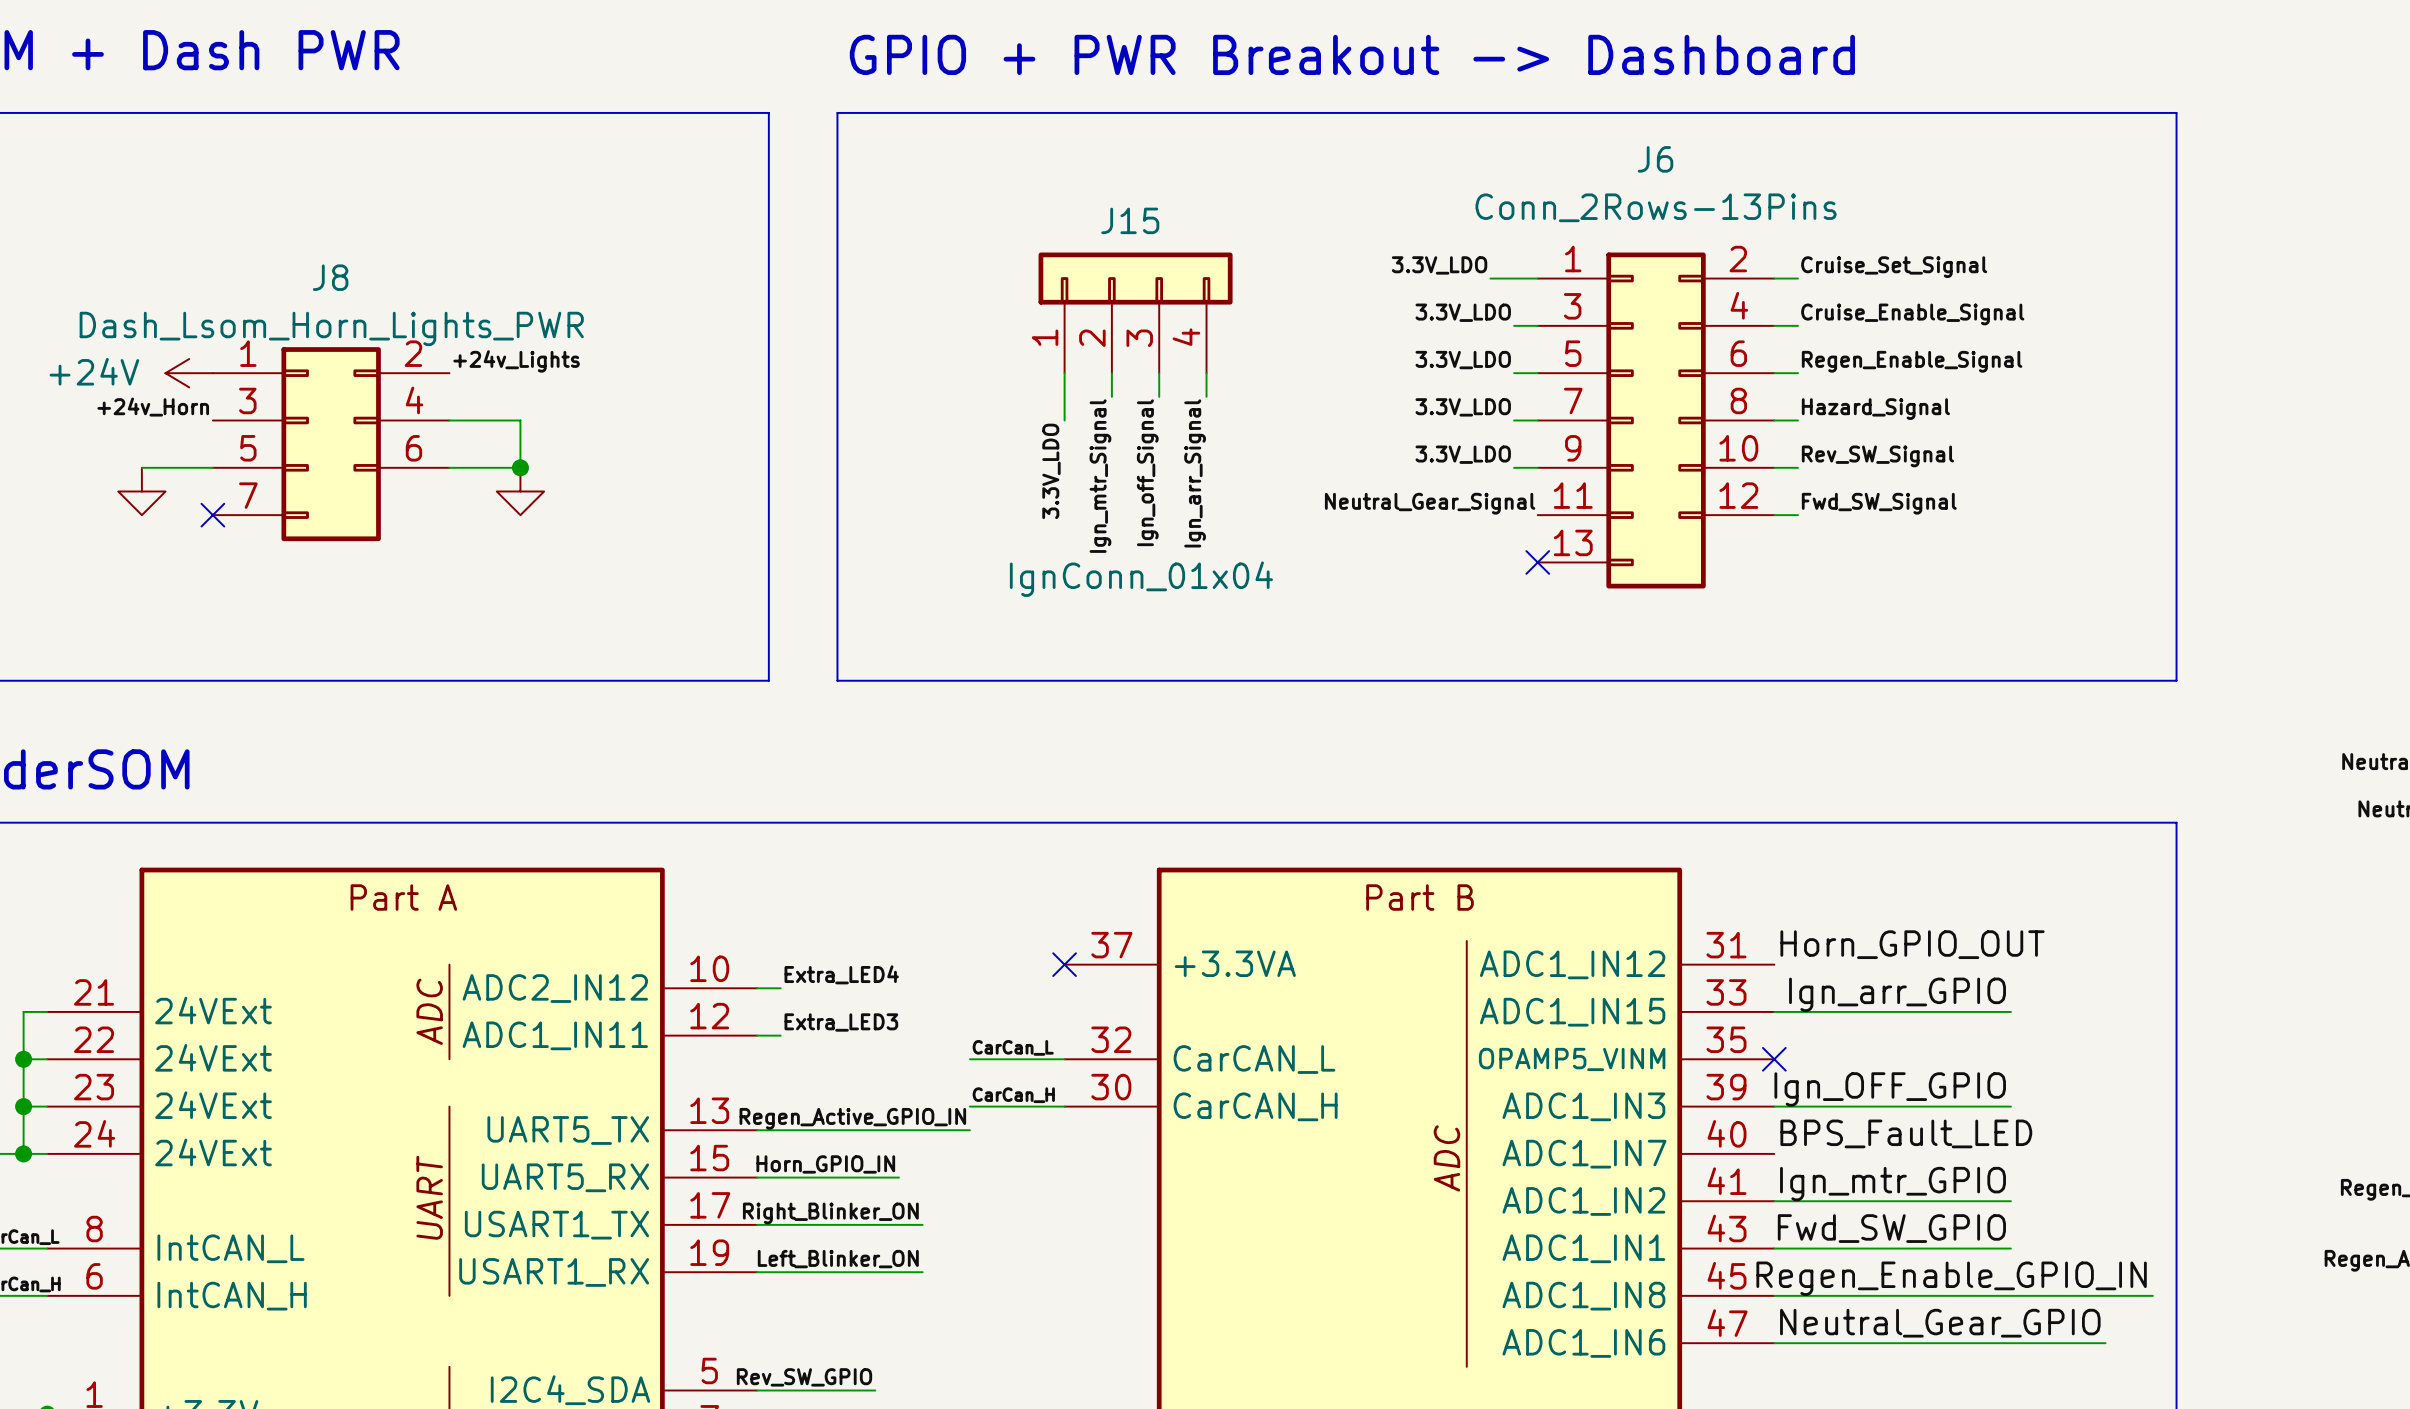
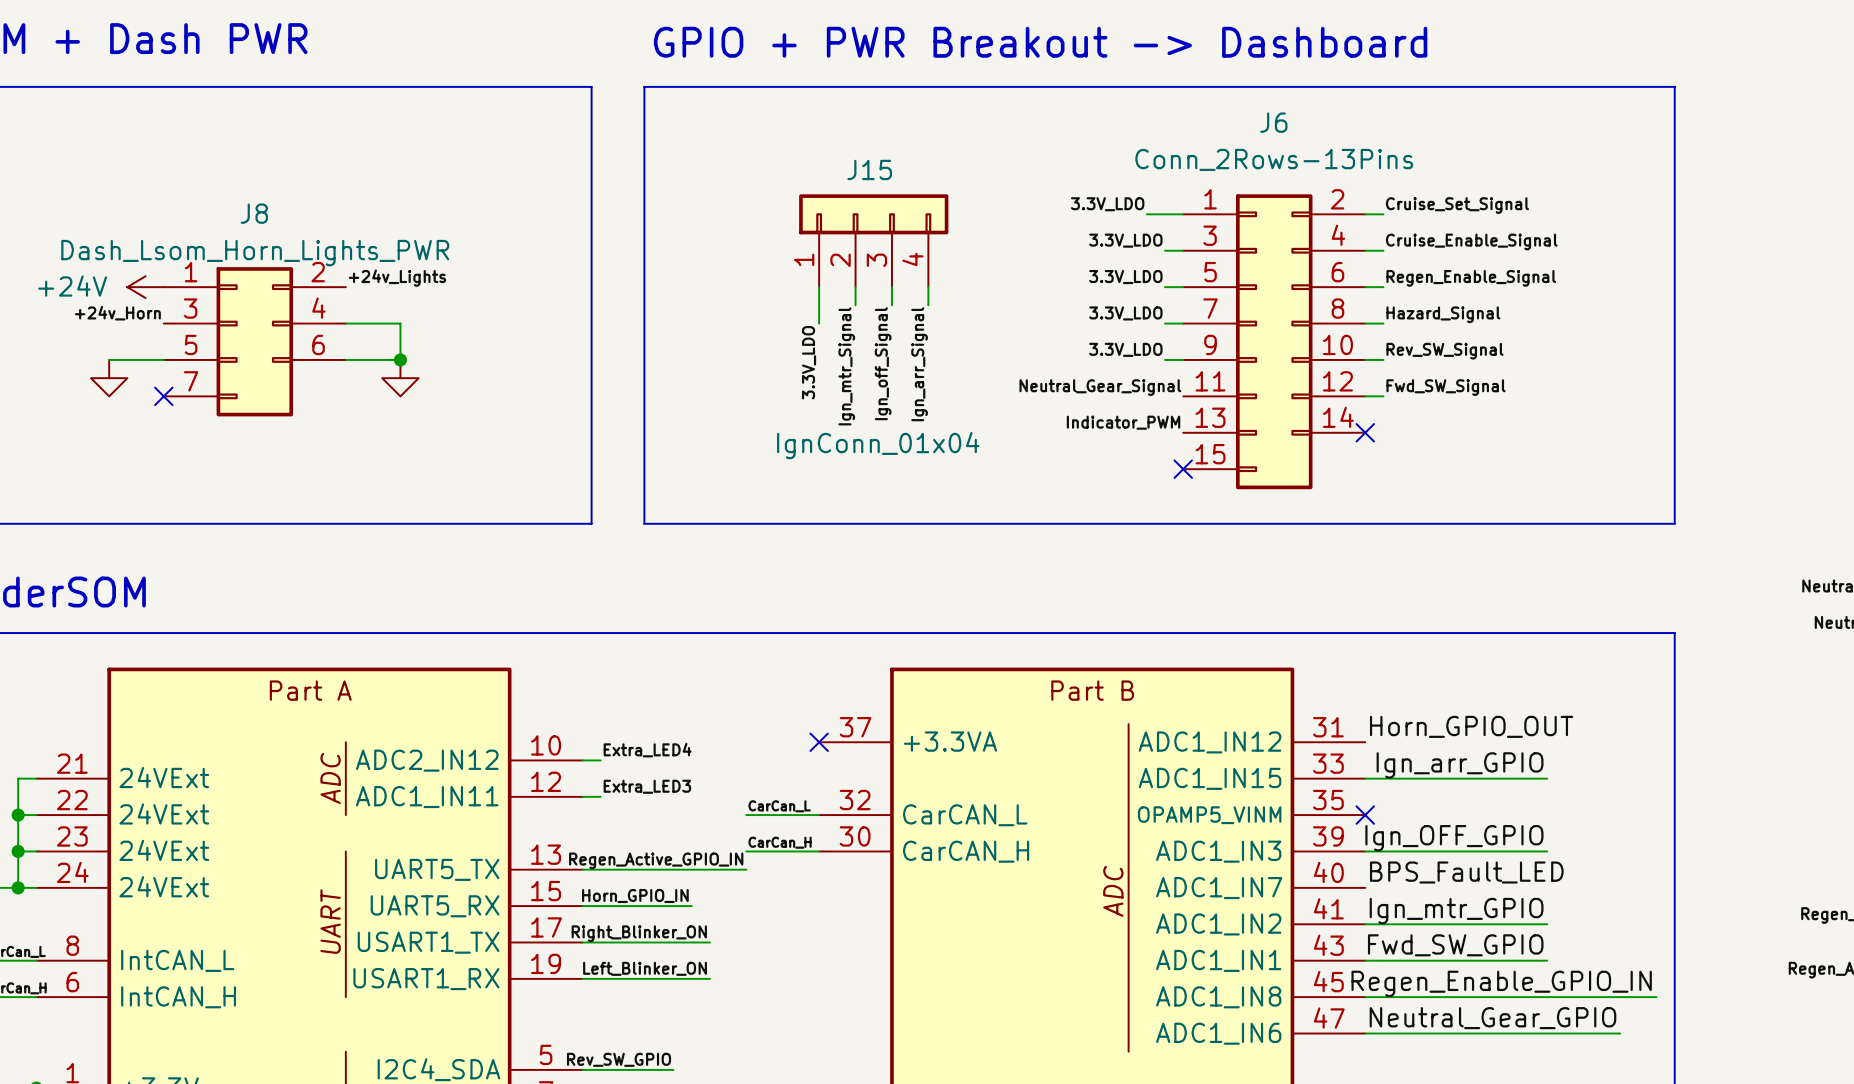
J6 symbol: [1537, 252, 1775, 589] -> [1183, 194, 1366, 490]
label: none -> Indicator_PWM (1123, 422)
no-connect mark position: (1537, 562) -> (1183, 469)
no-connect mark: none -> (1365, 432)

